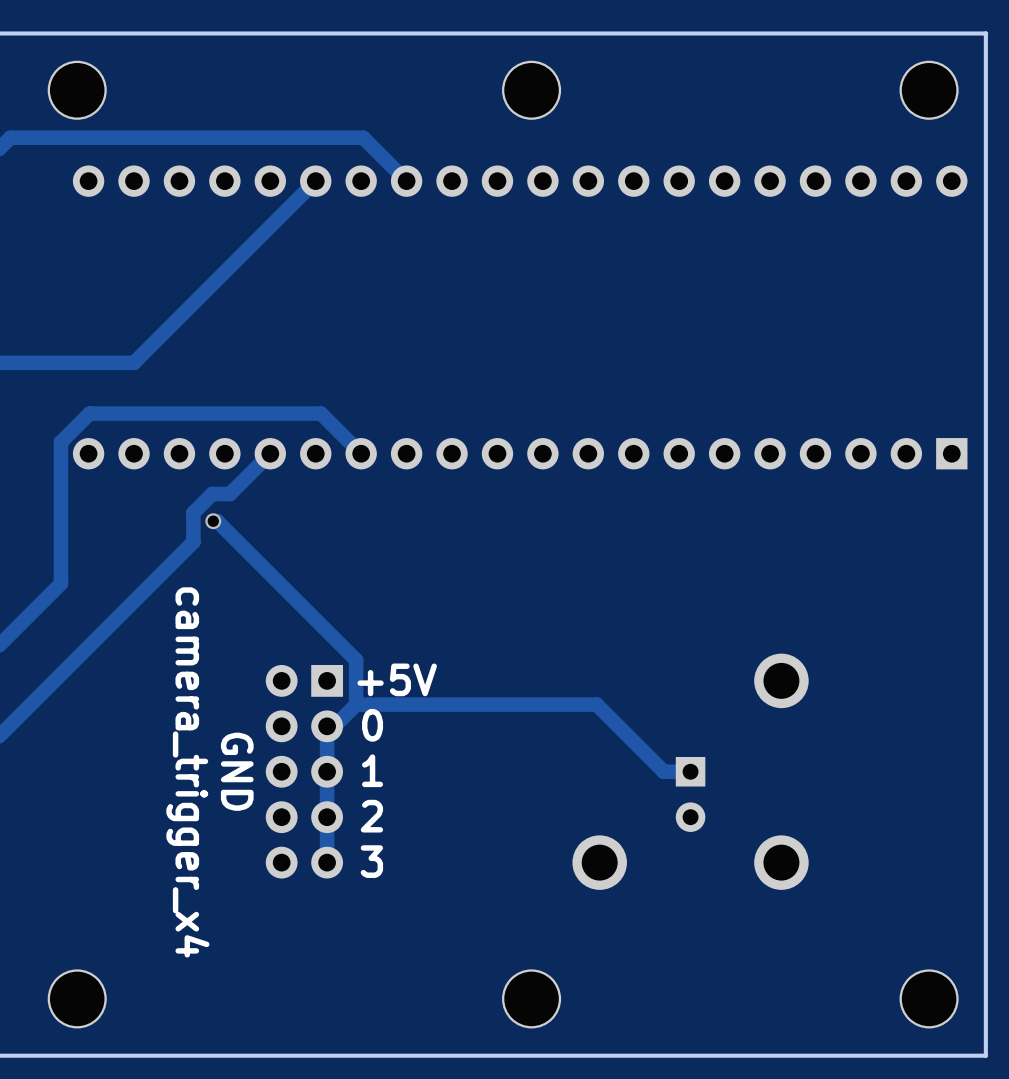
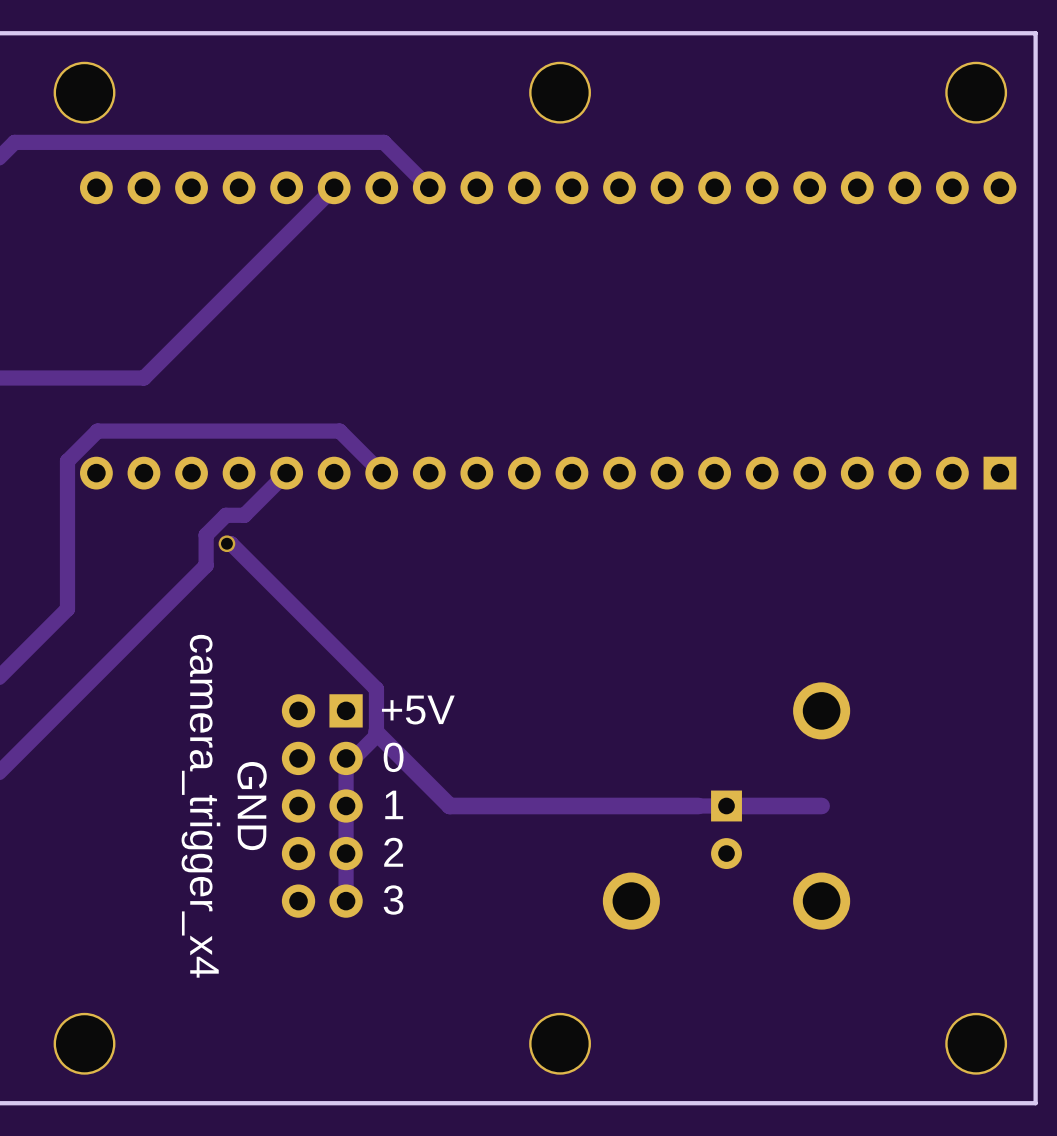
track: (356, 704) (596, 704) (663, 771) -> (376, 732) (449, 805) (698, 805)
track: none -> (821, 805) (726, 805)

